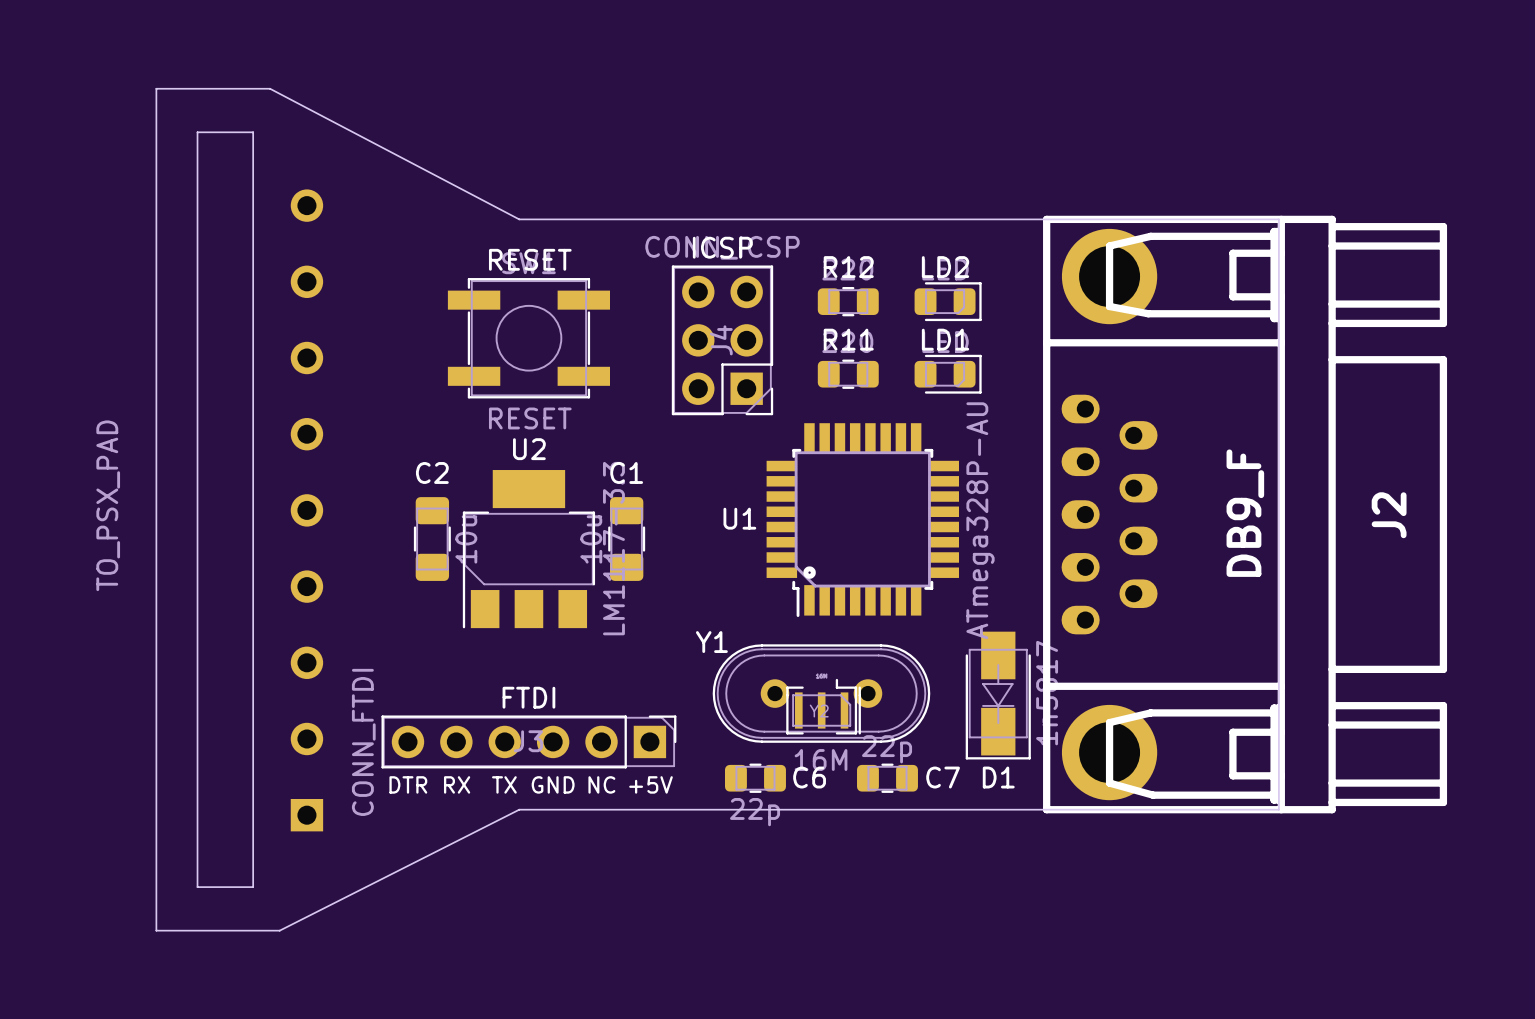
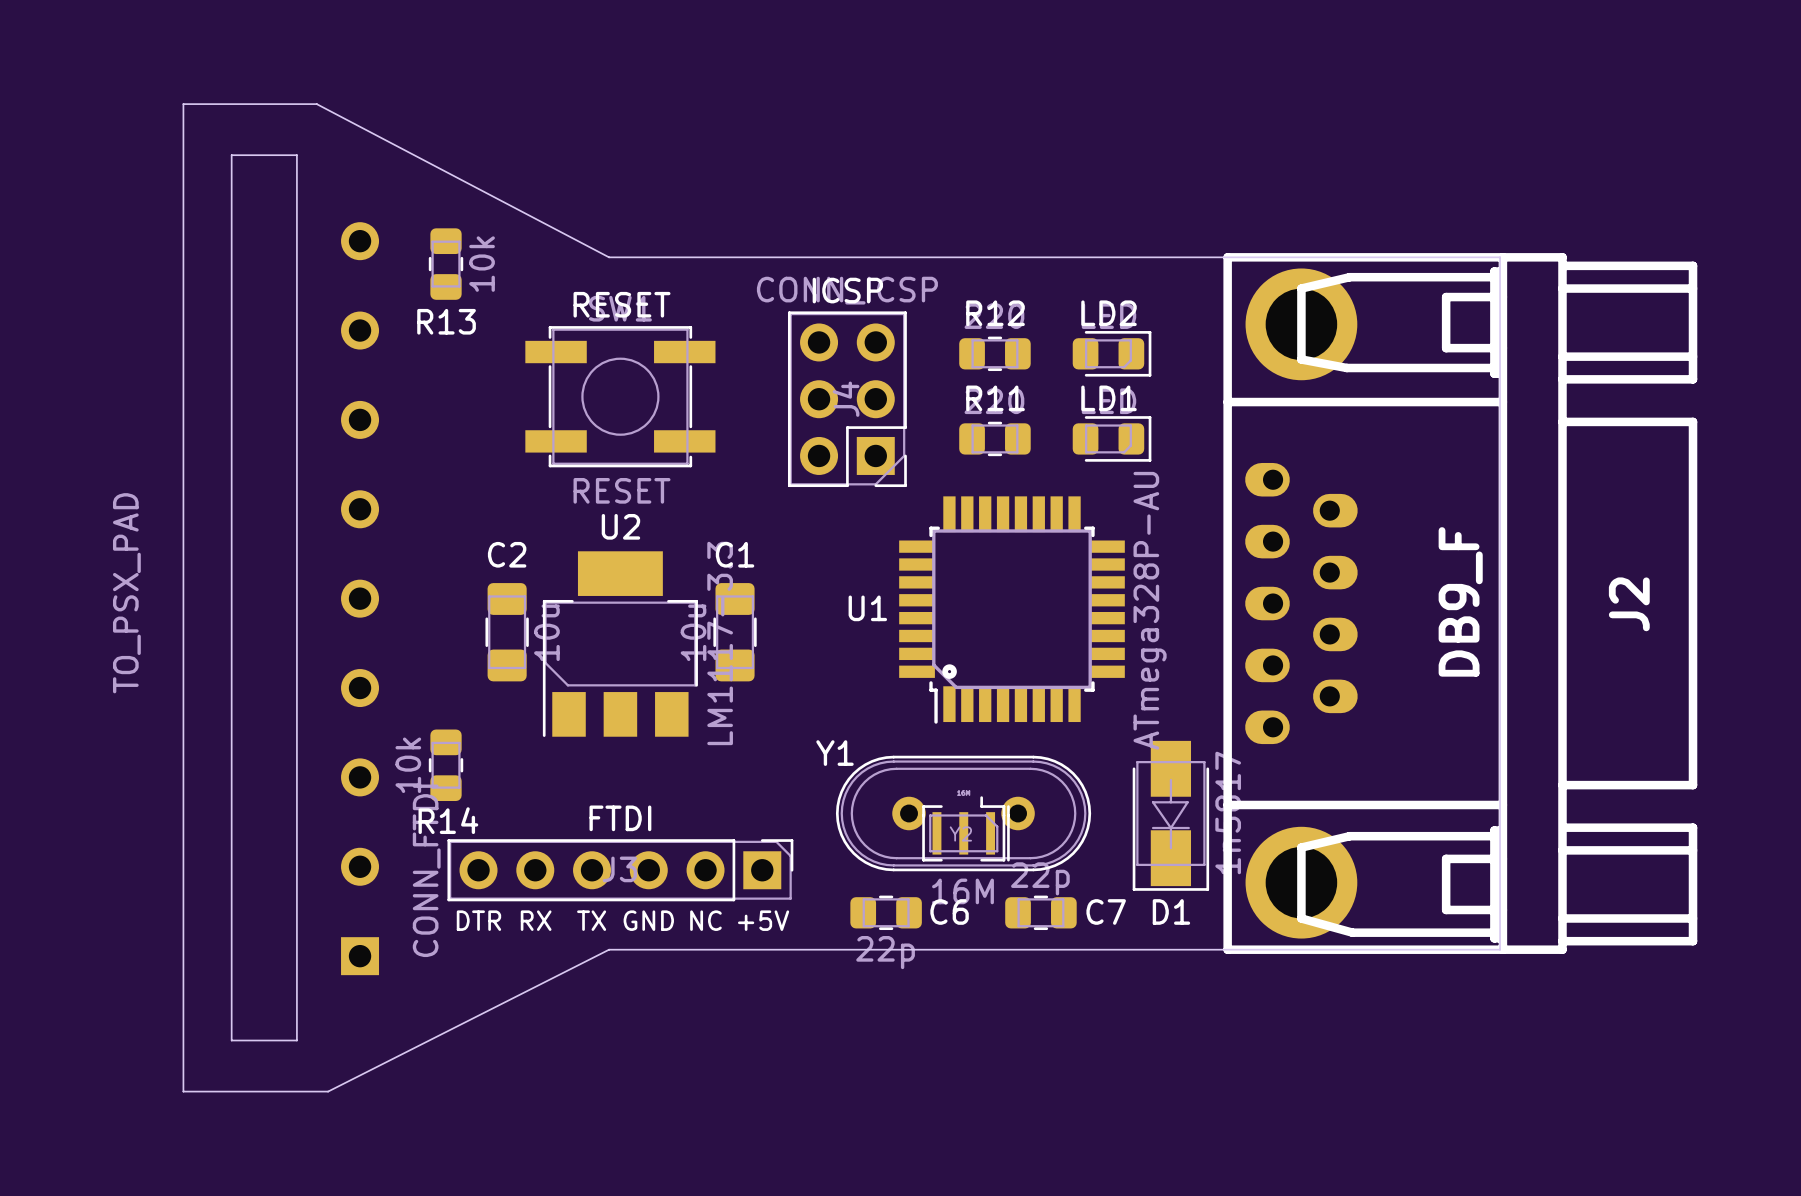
R13: none -> 10k (446, 264)
R14: none -> 10k (446, 765)

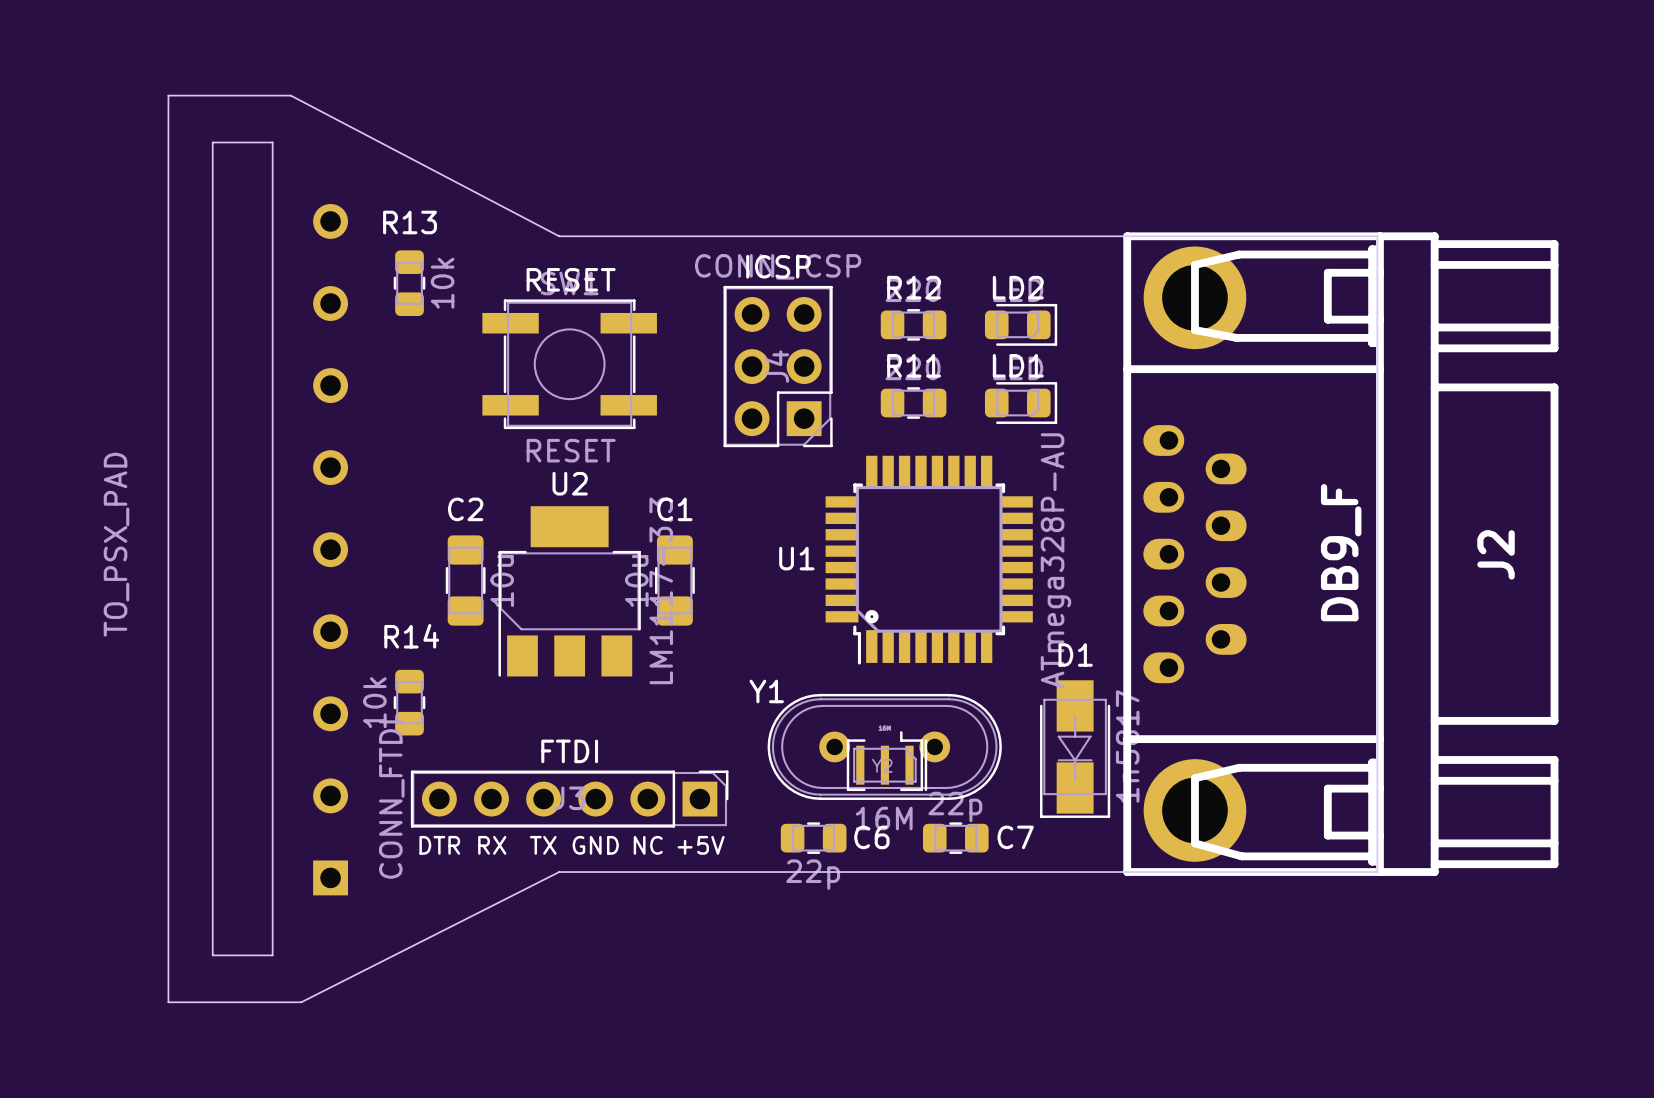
R13 position: (446, 264) -> (409, 283)
R13 name position: R13 (446, 321) -> R13 (410, 222)
R14 name position: R14 (448, 820) -> R14 (411, 636)
D1 name position: D1 (1171, 911) -> D1 (1075, 654)

